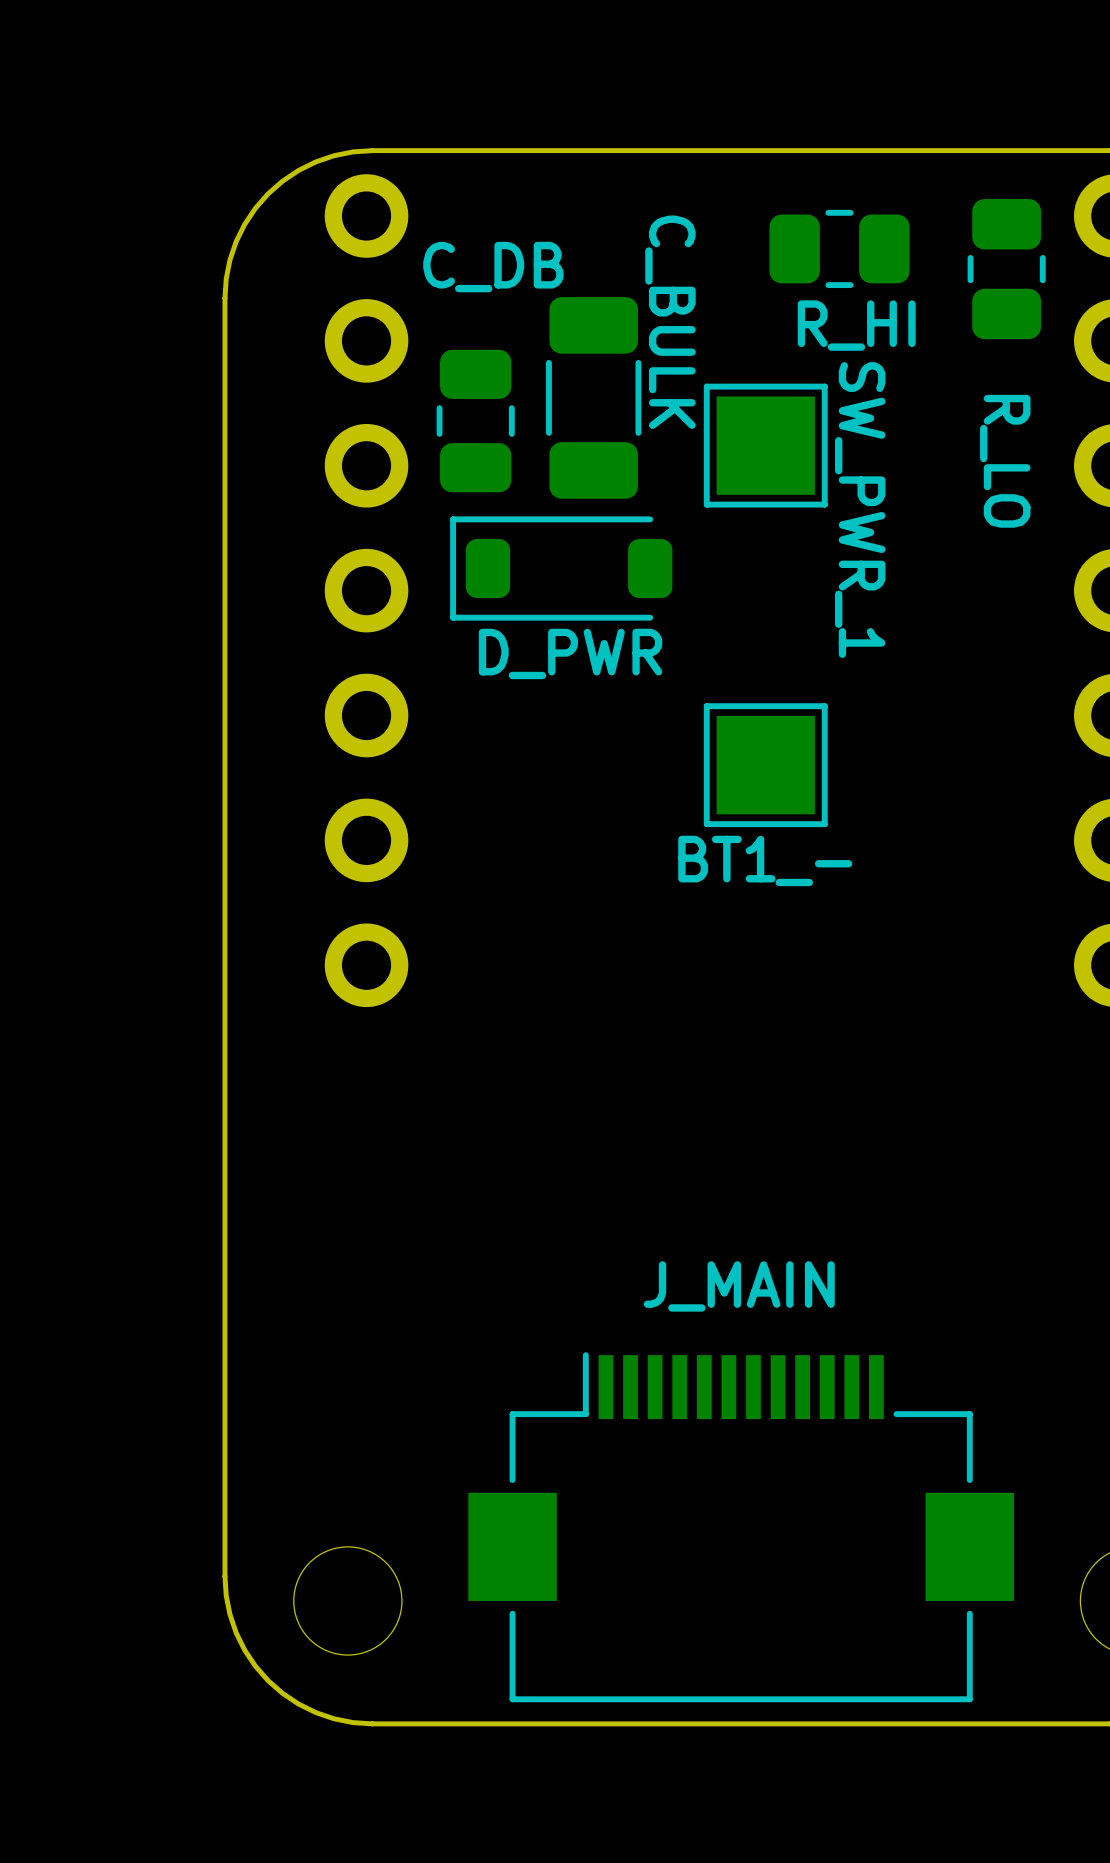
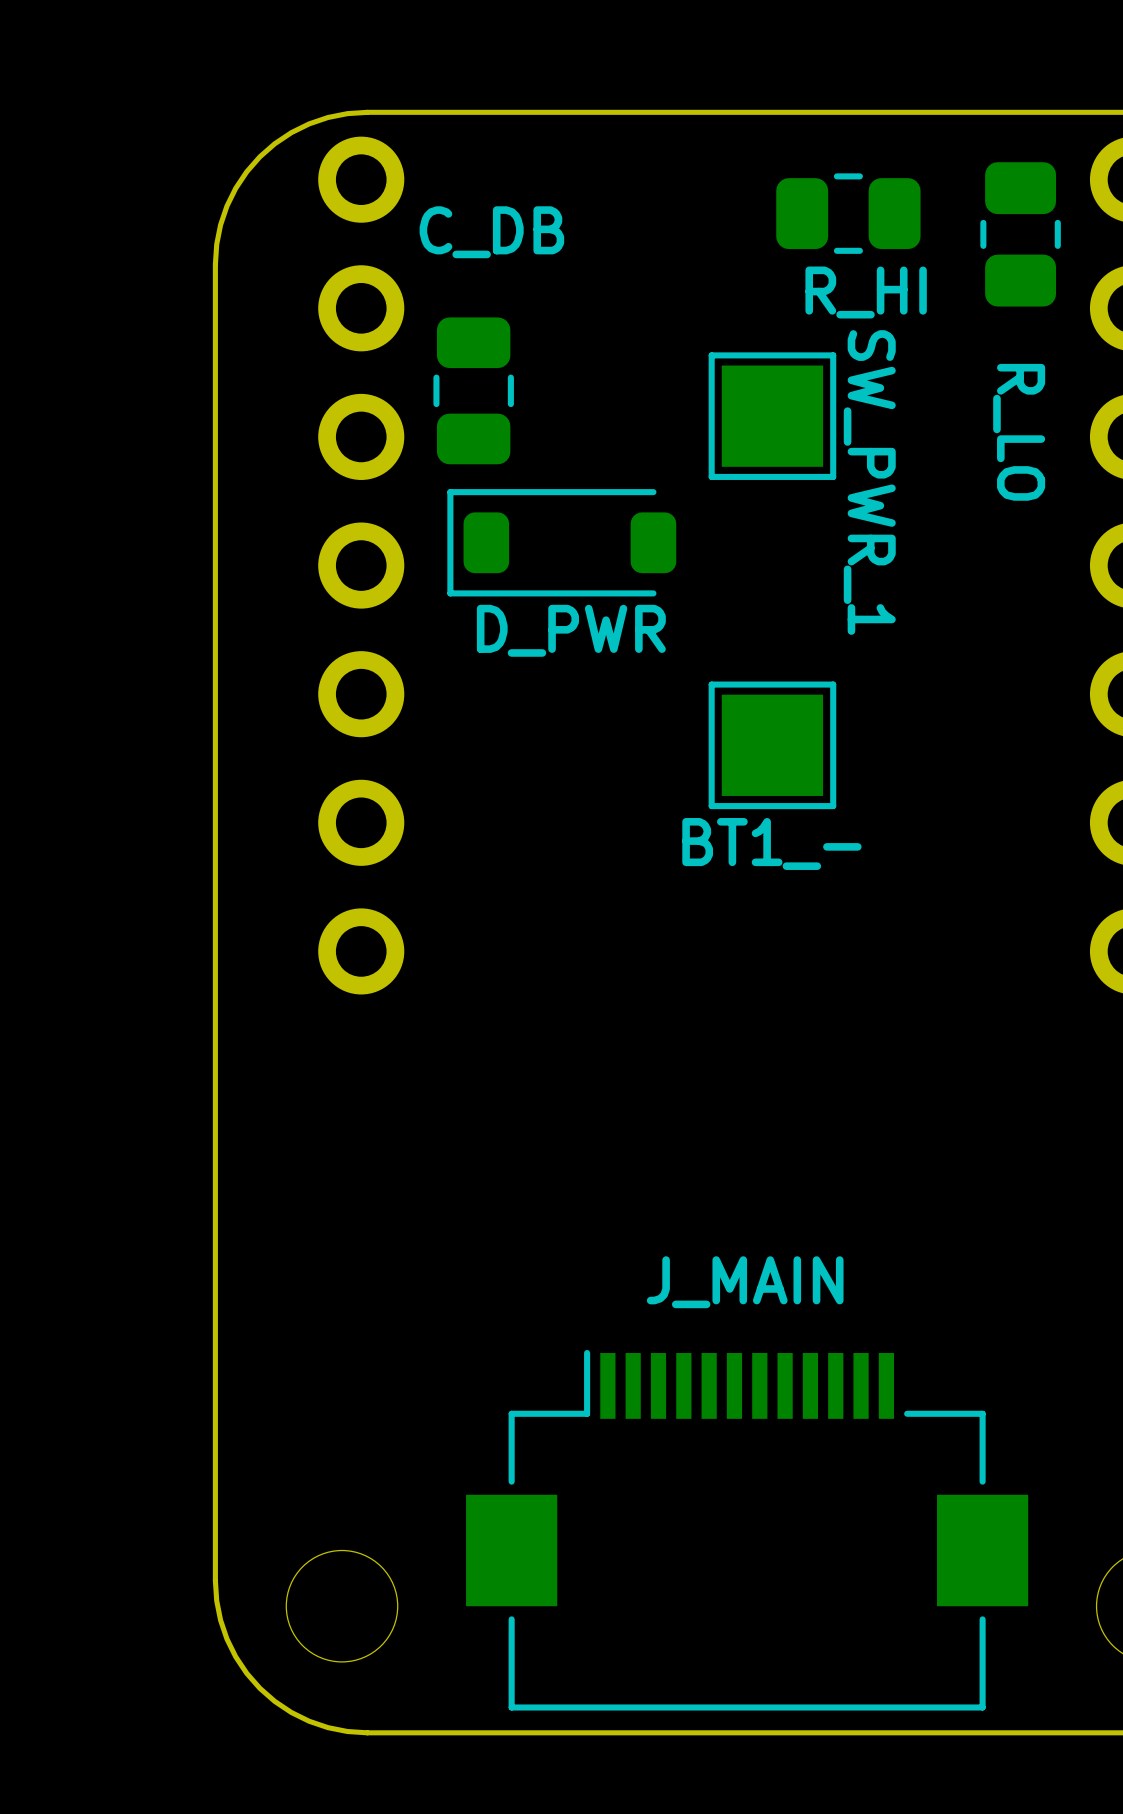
C_BULK: (593, 397) -> none

